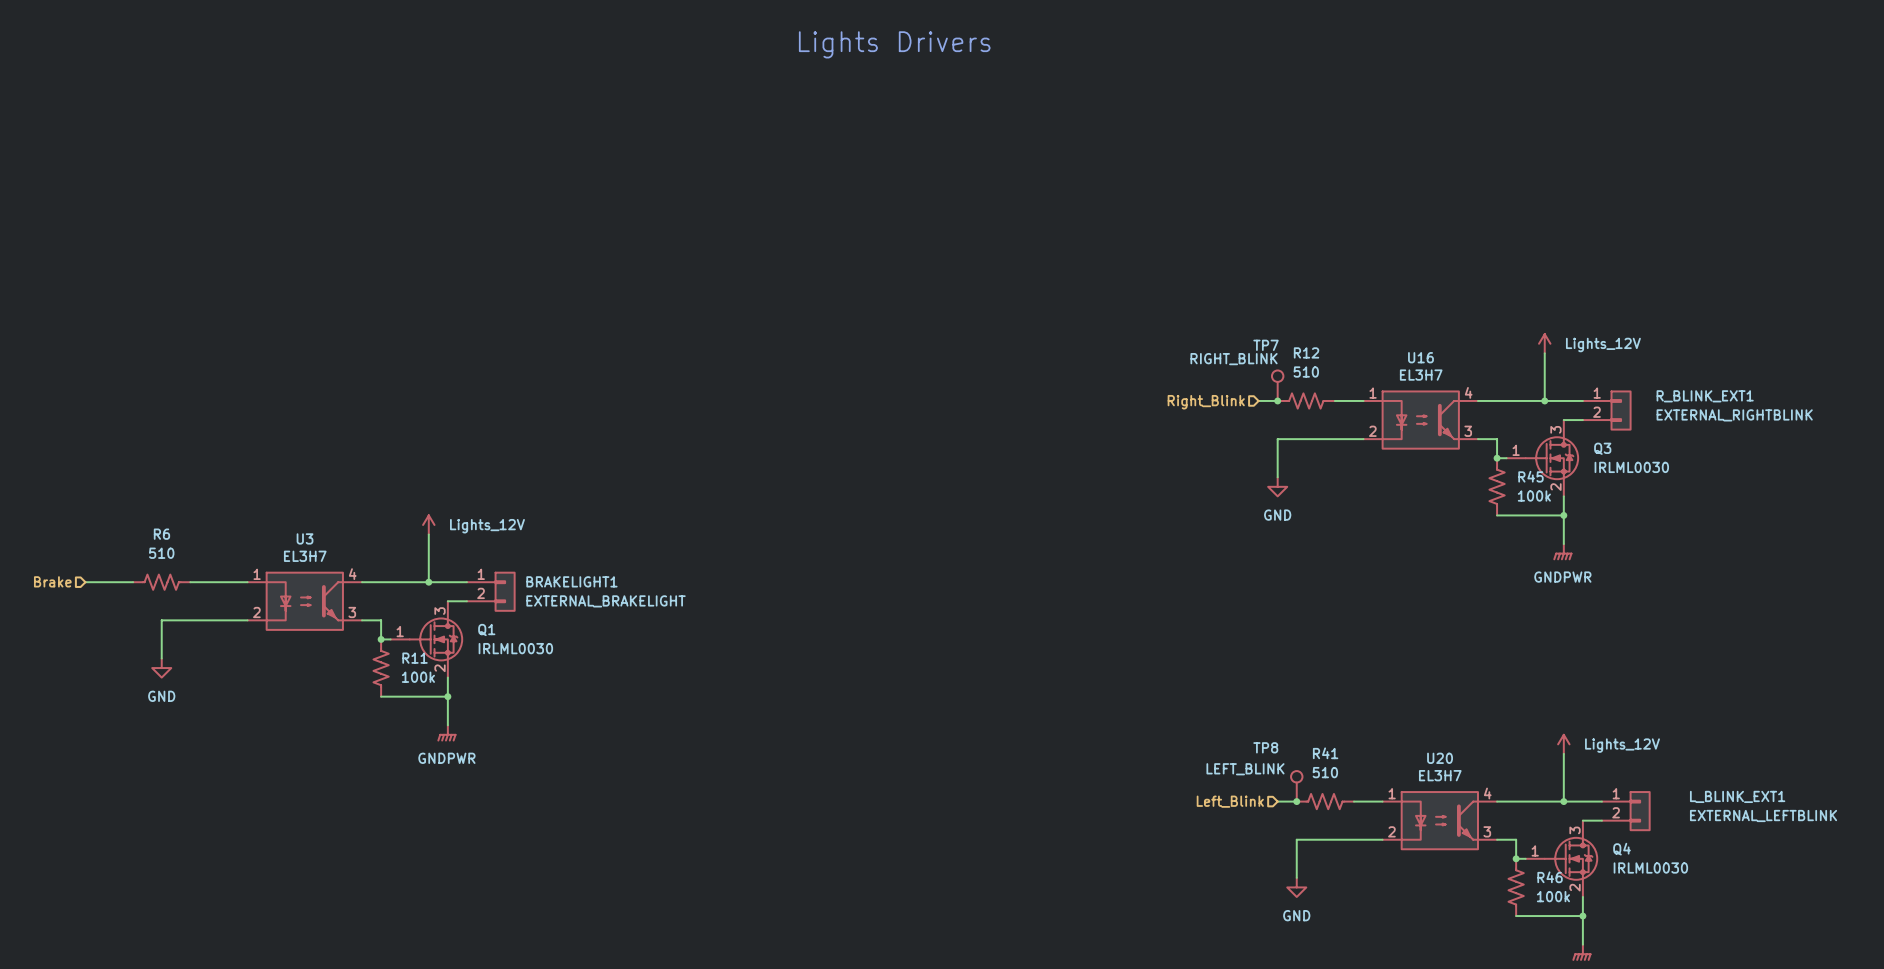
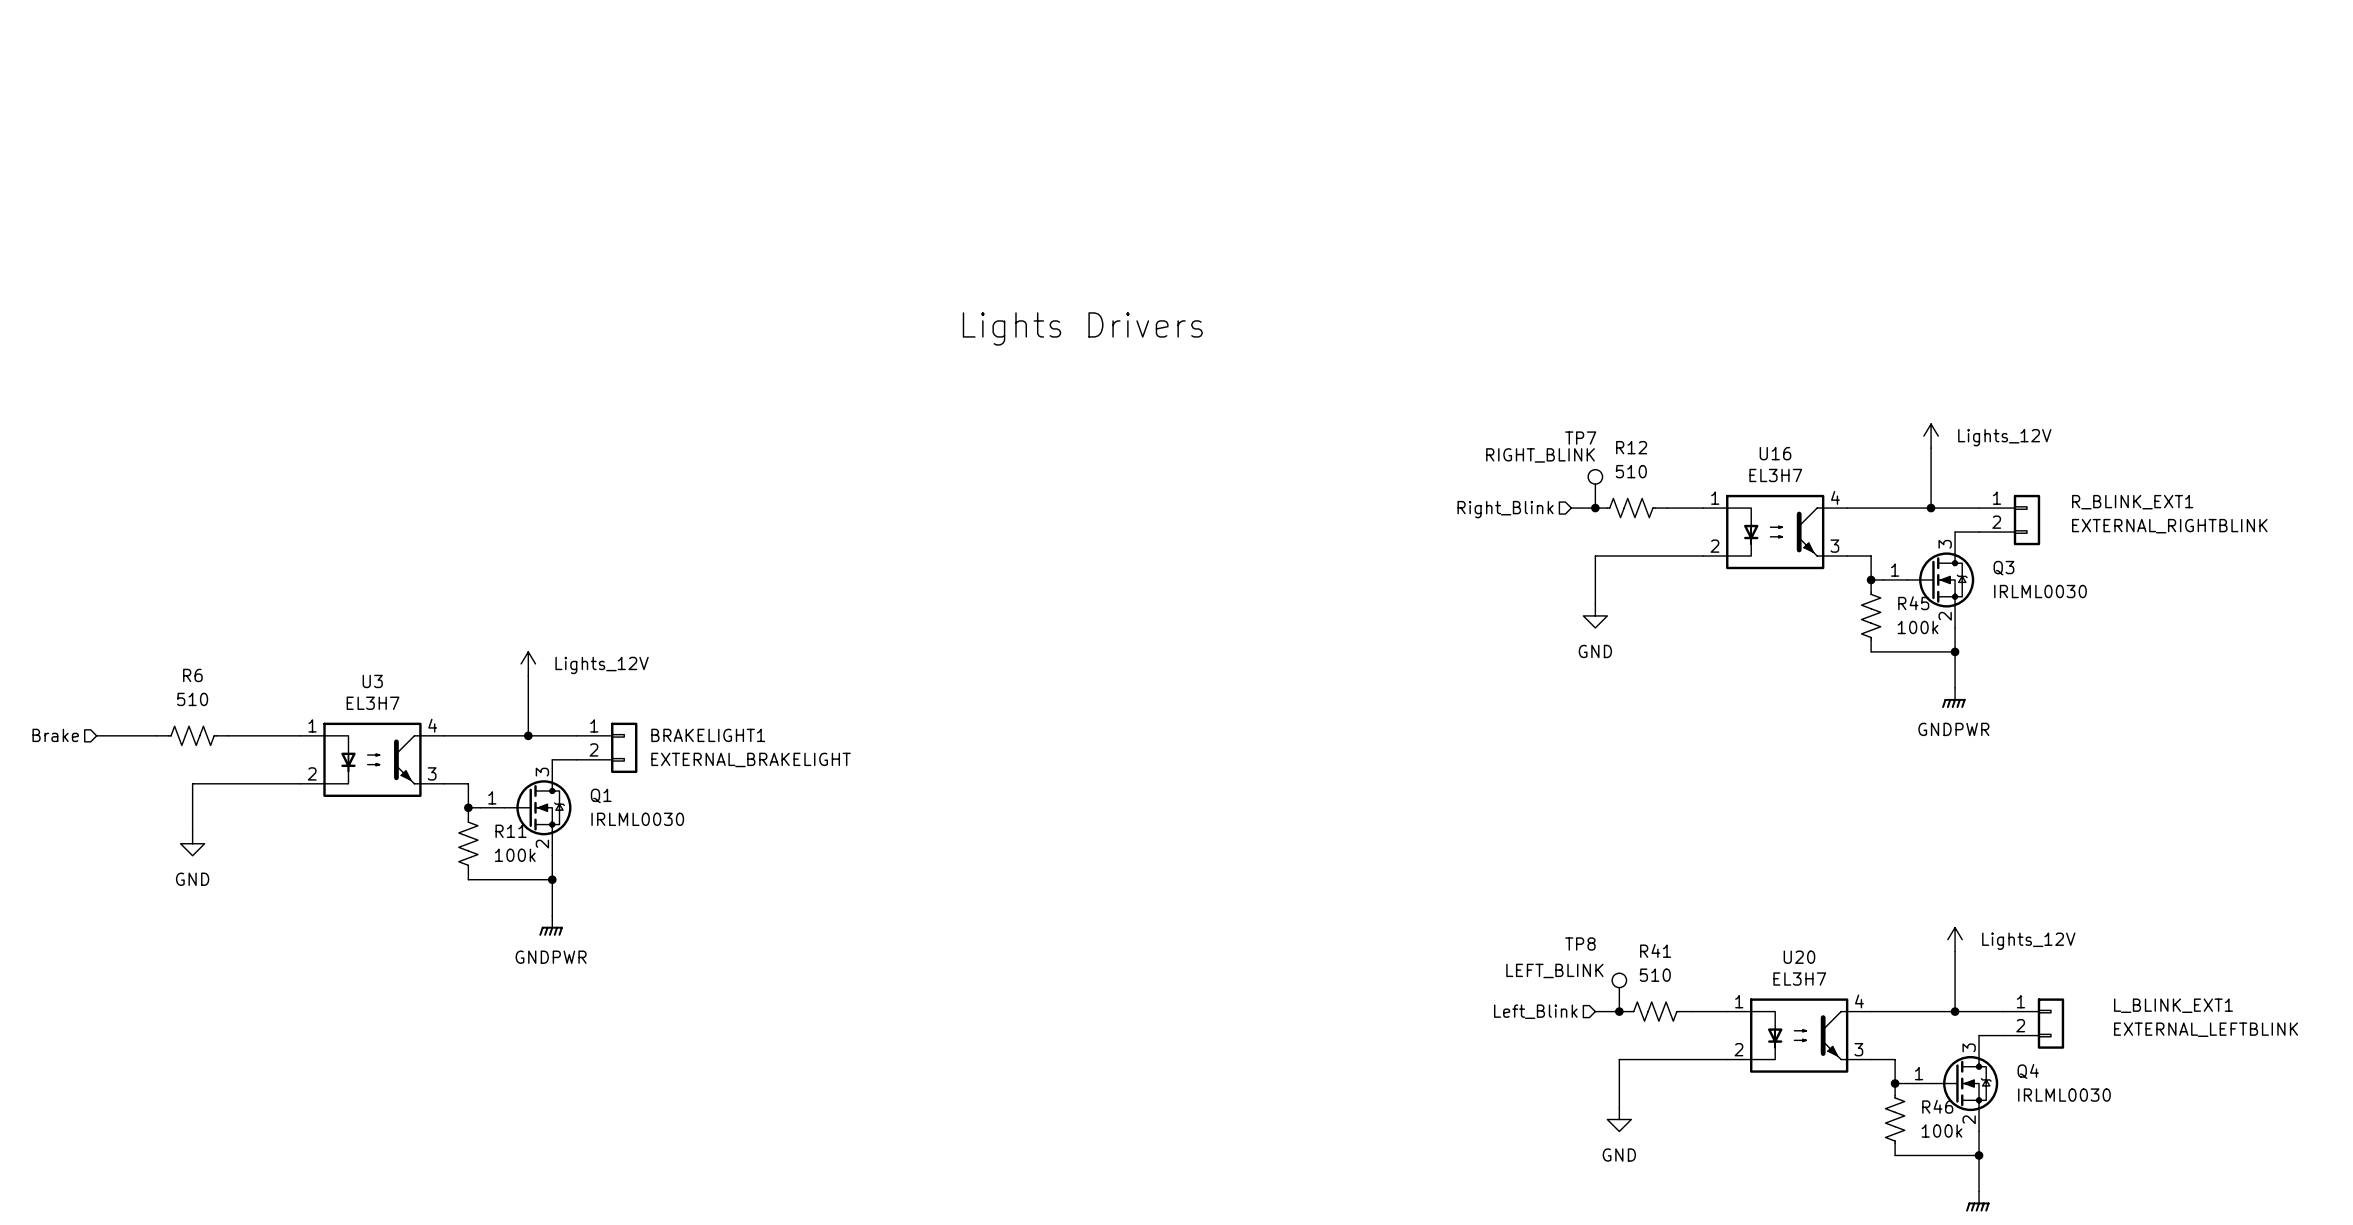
text: Lights Drivers (894, 44) -> none
text: none -> Lights Drivers (1082, 328)

